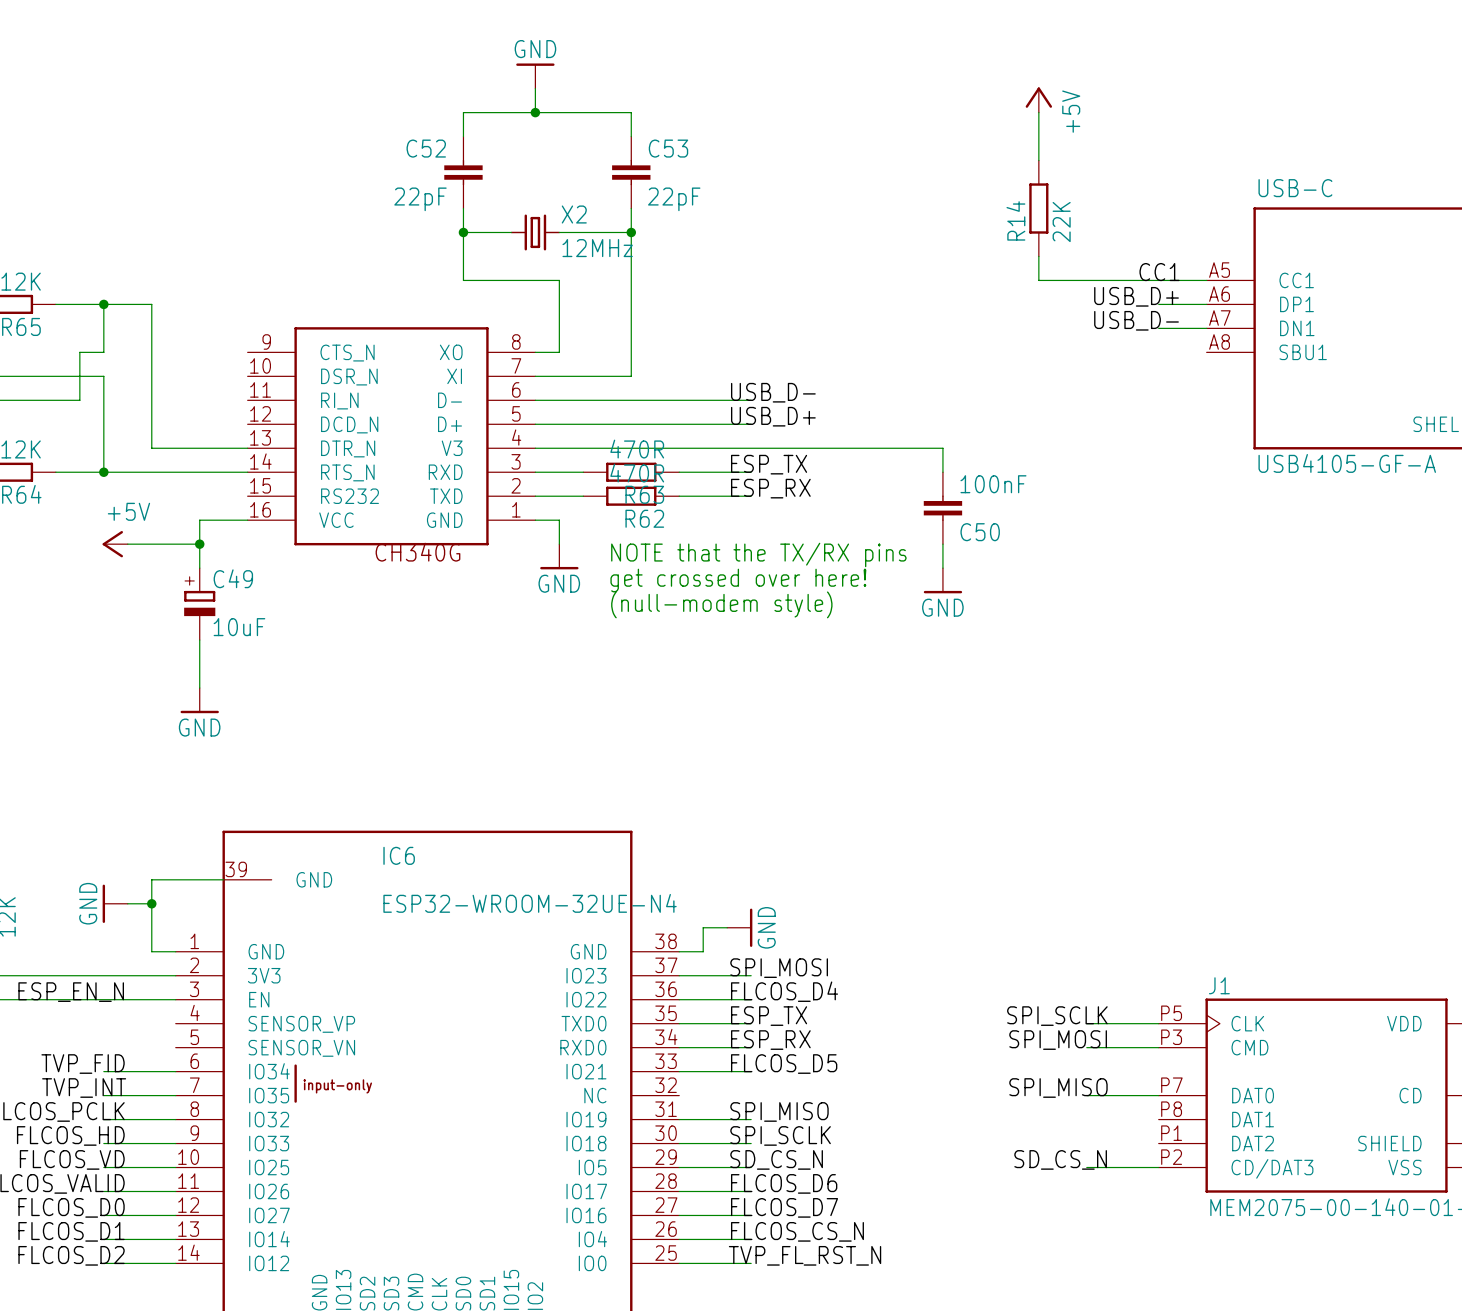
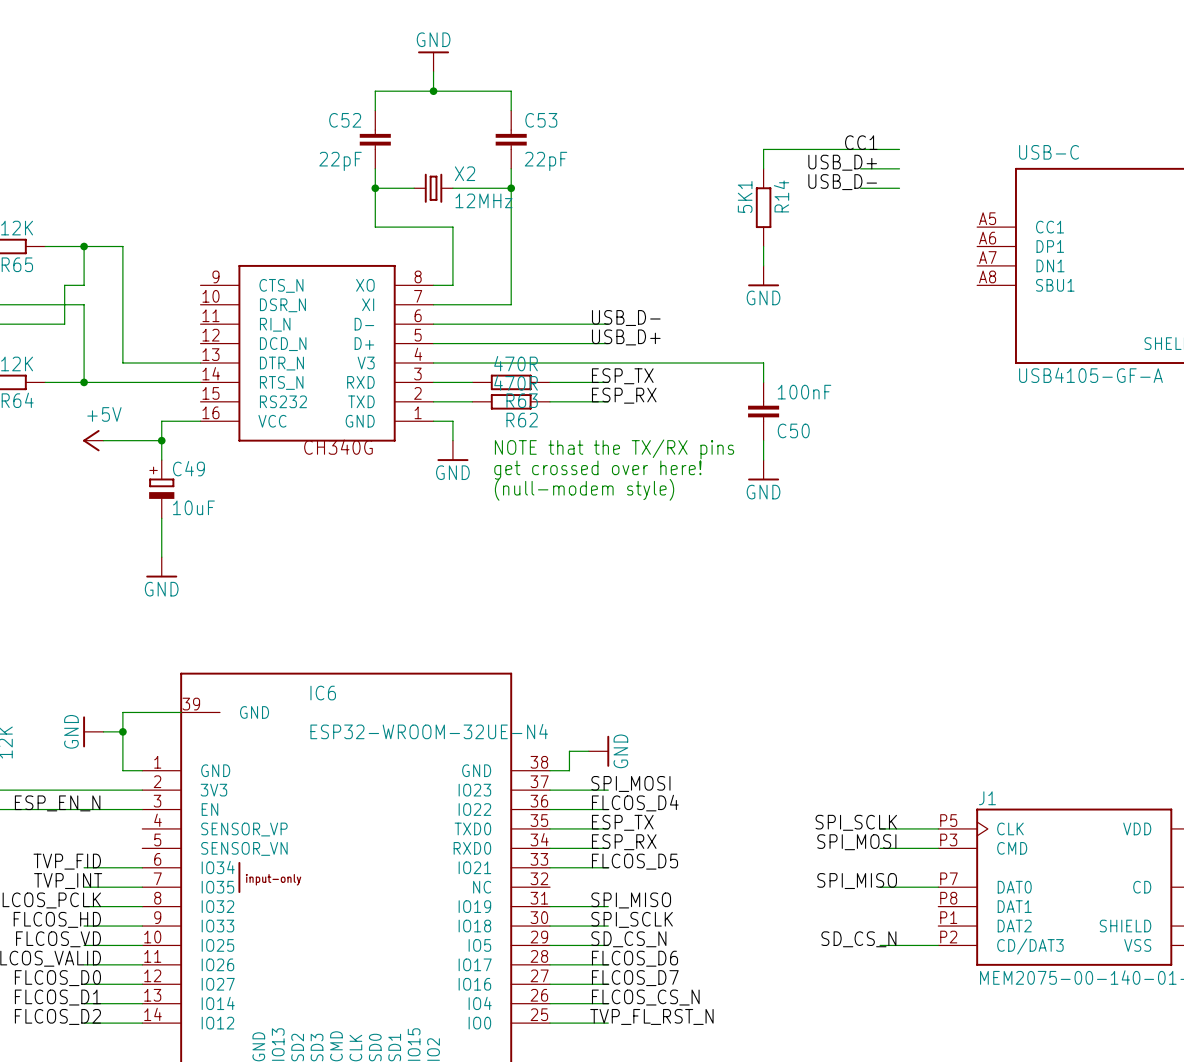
power symbol: +5V (1038, 100) -> none
wire: (1038, 112) (1038, 160) -> none
wire: none -> (899, 149) (763, 149) (763, 168)
R14 position: (1038, 208) -> (763, 207)
R14 name position: R14 (1015, 220) -> R14 (781, 196)
R14 value: 22K (1061, 222) -> 5K1 (745, 197)
wire: (1038, 256) (1038, 280) (1206, 280) -> none
label position: CC1 (1159, 272) -> CC1 (861, 142)
label position: USB_D+ (1136, 296) -> USB_D+ (842, 162)
wire: none -> (763, 246) (763, 265)
wire: (1158, 304) (1206, 304) -> (860, 168) (899, 168)
label position: USB_D- (1136, 320) -> USB_D- (842, 182)
wire: (1158, 328) (1206, 328) -> (860, 188) (899, 188)
power symbol: none -> GND (763, 276)

